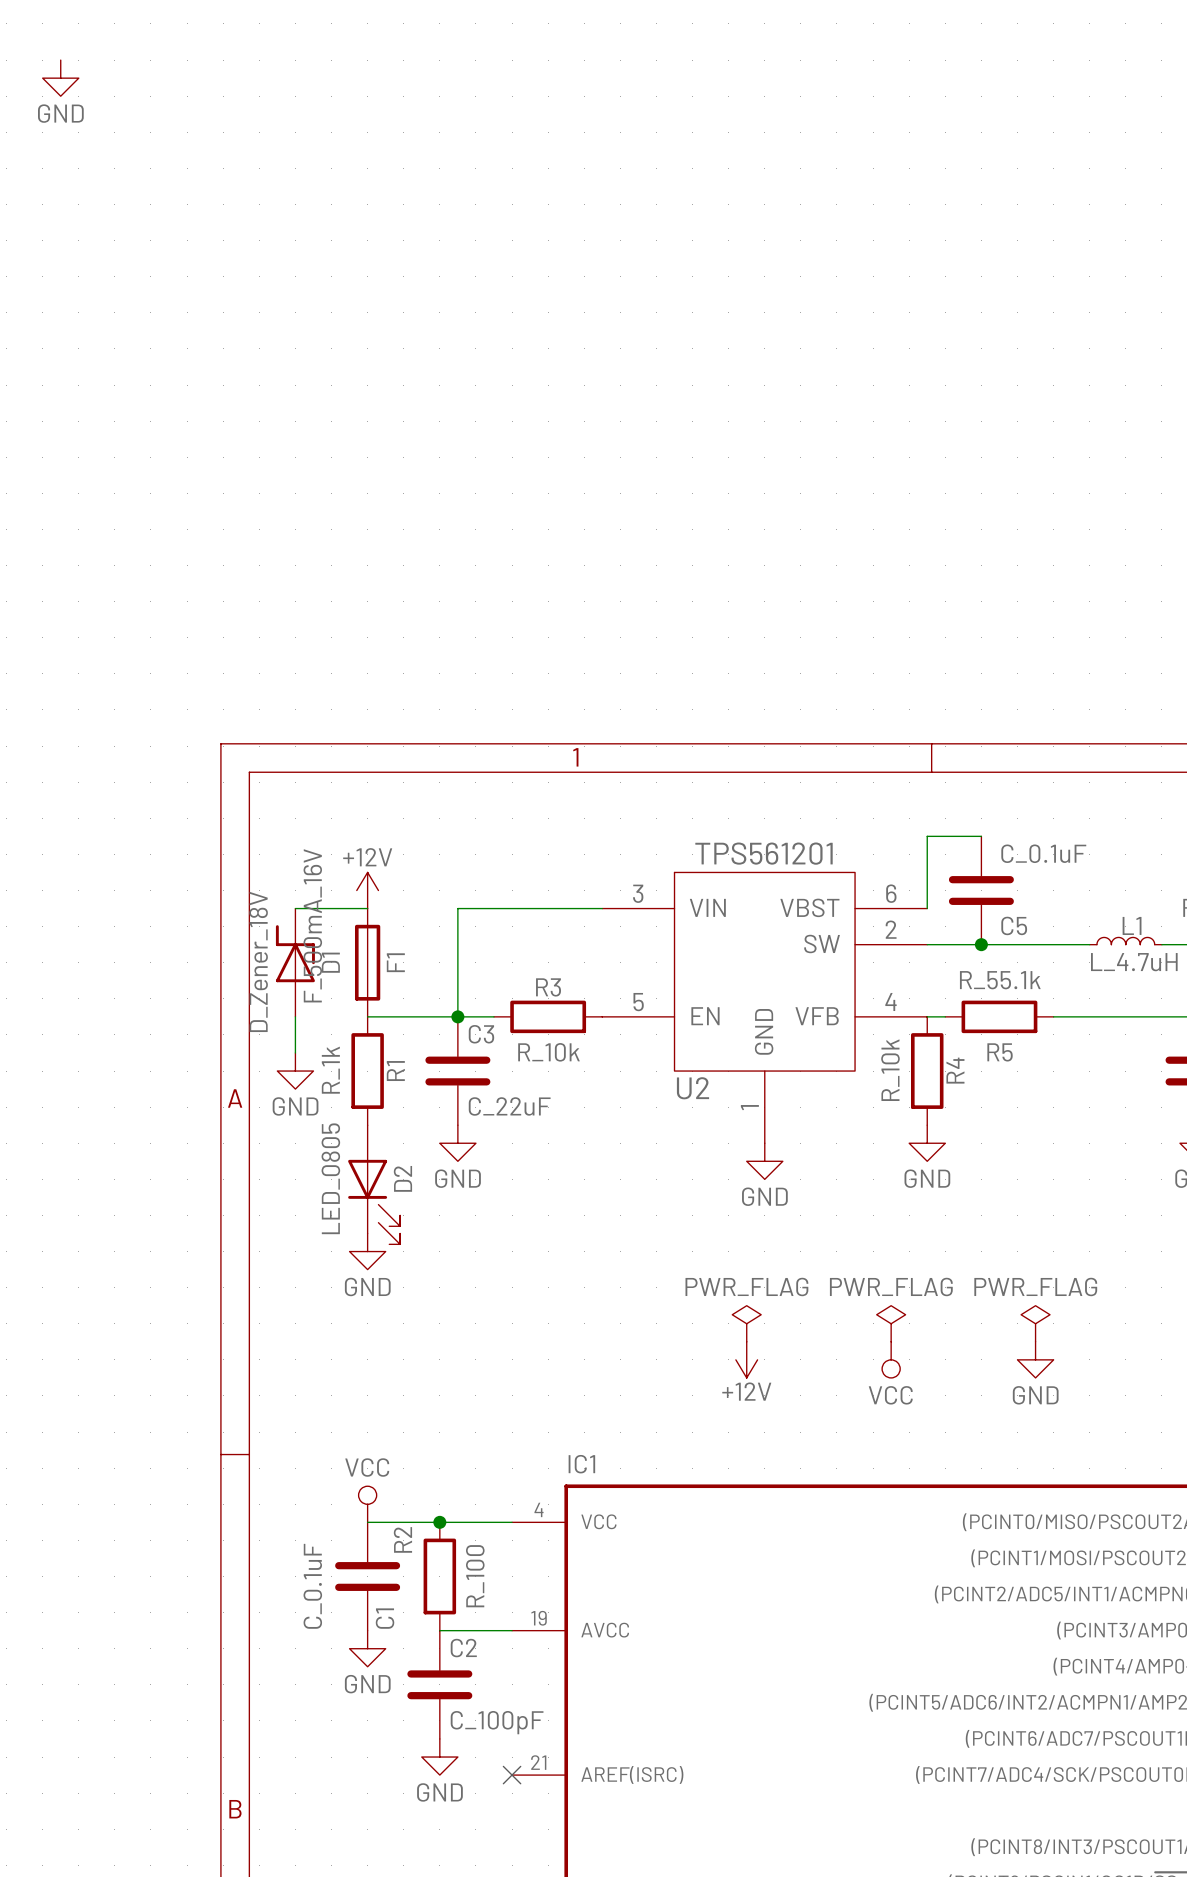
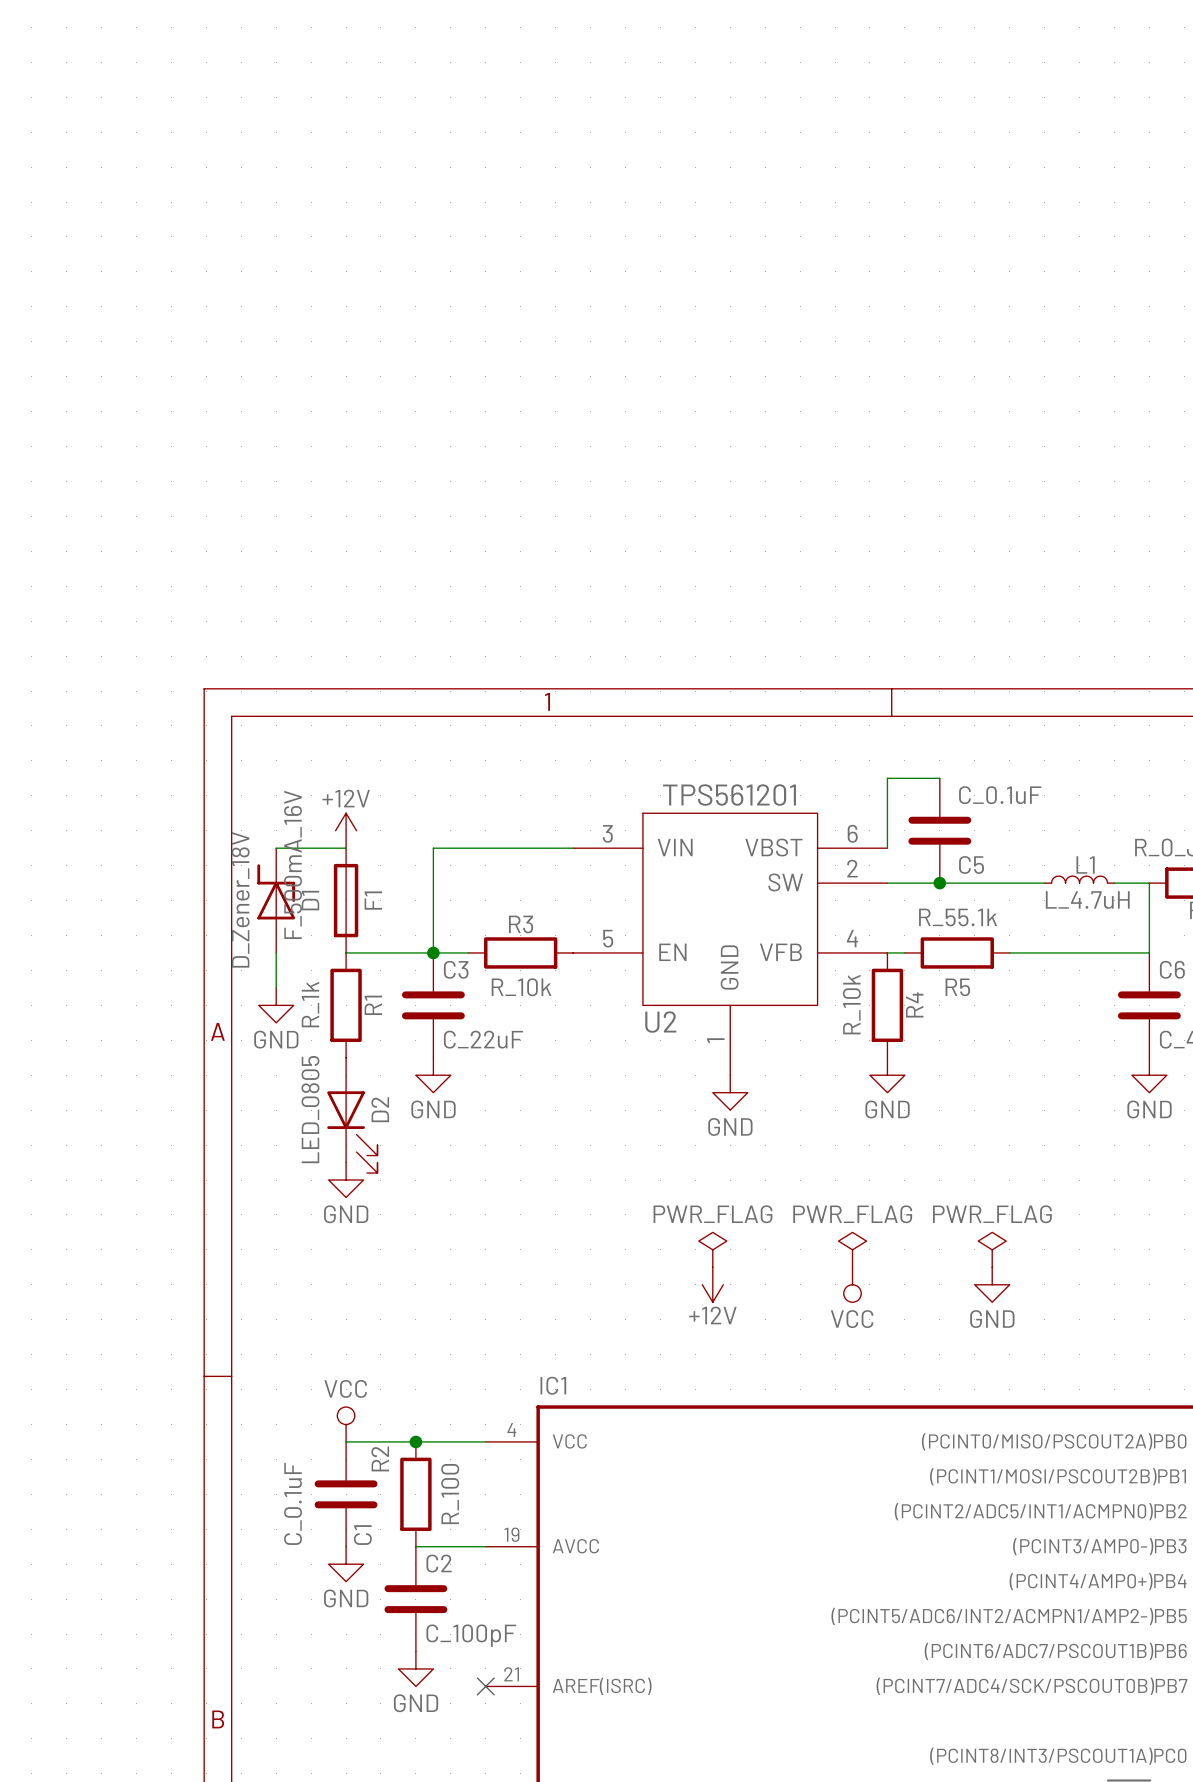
power symbol: GND (60, 78) -> none

